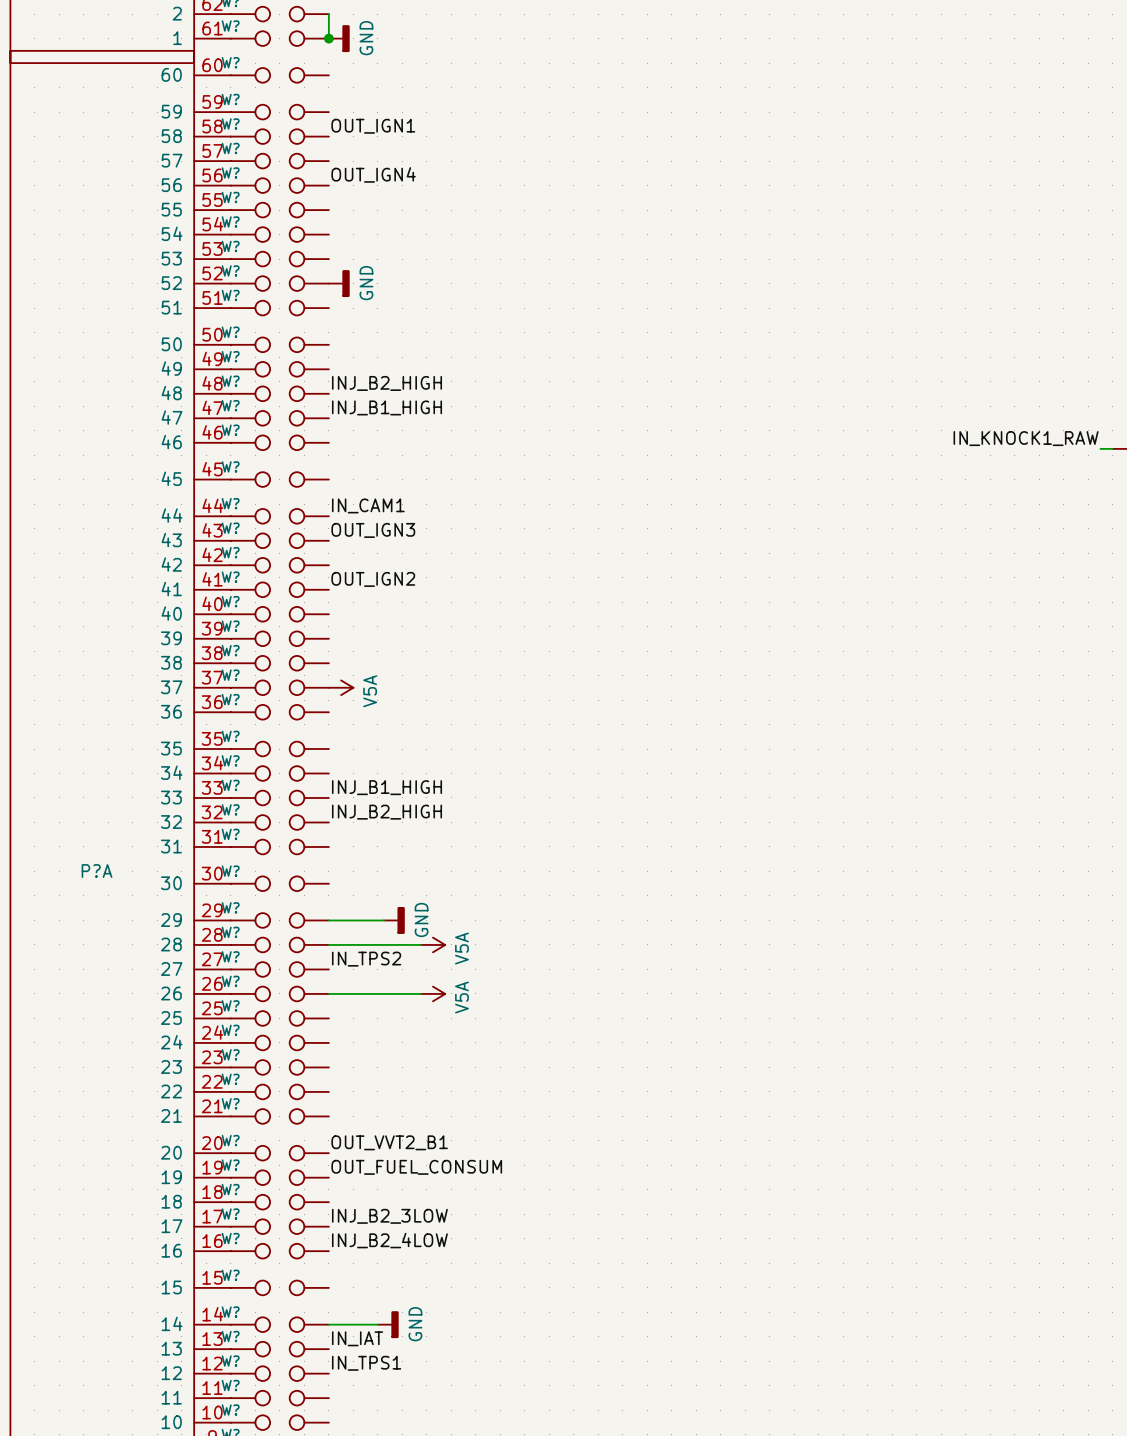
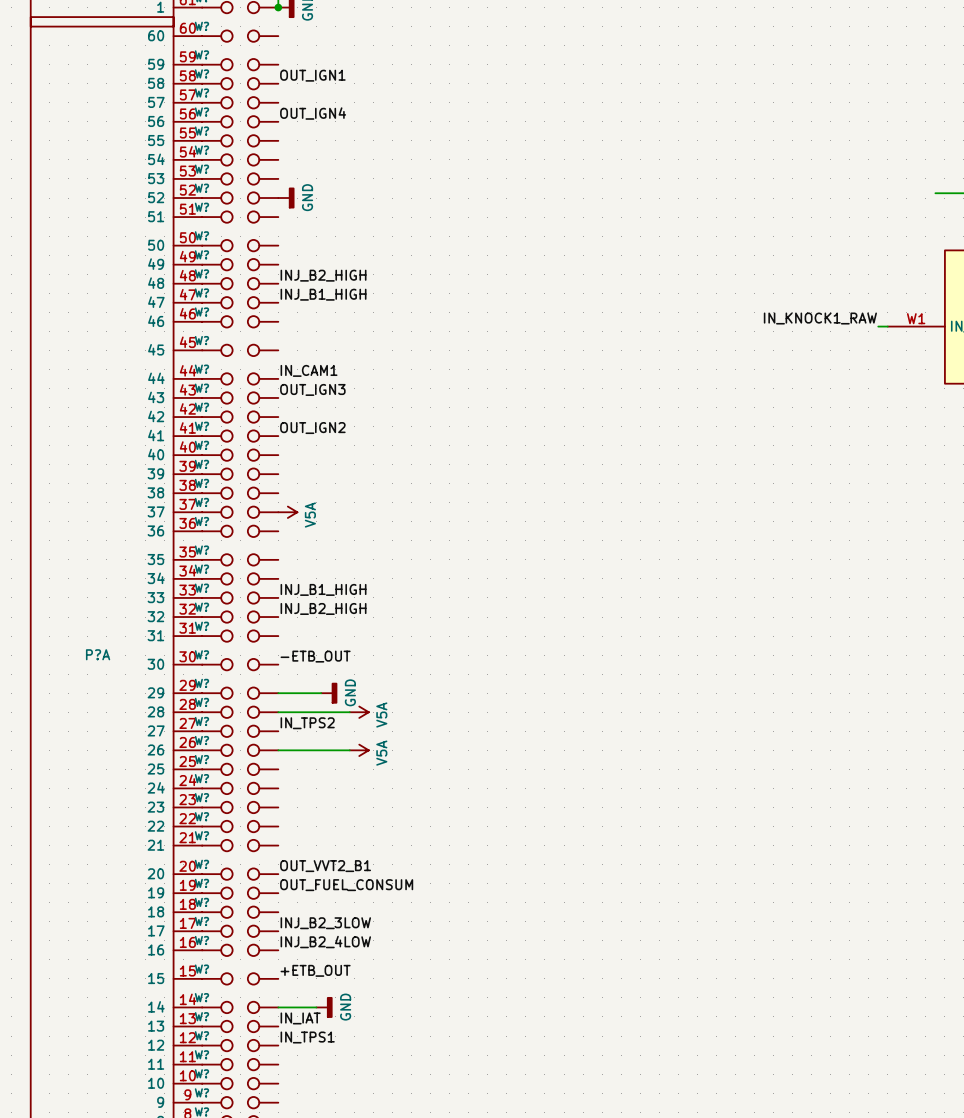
label: none -> -ETB_OUT (315, 656)
label: none -> +ETB_OUT (315, 970)

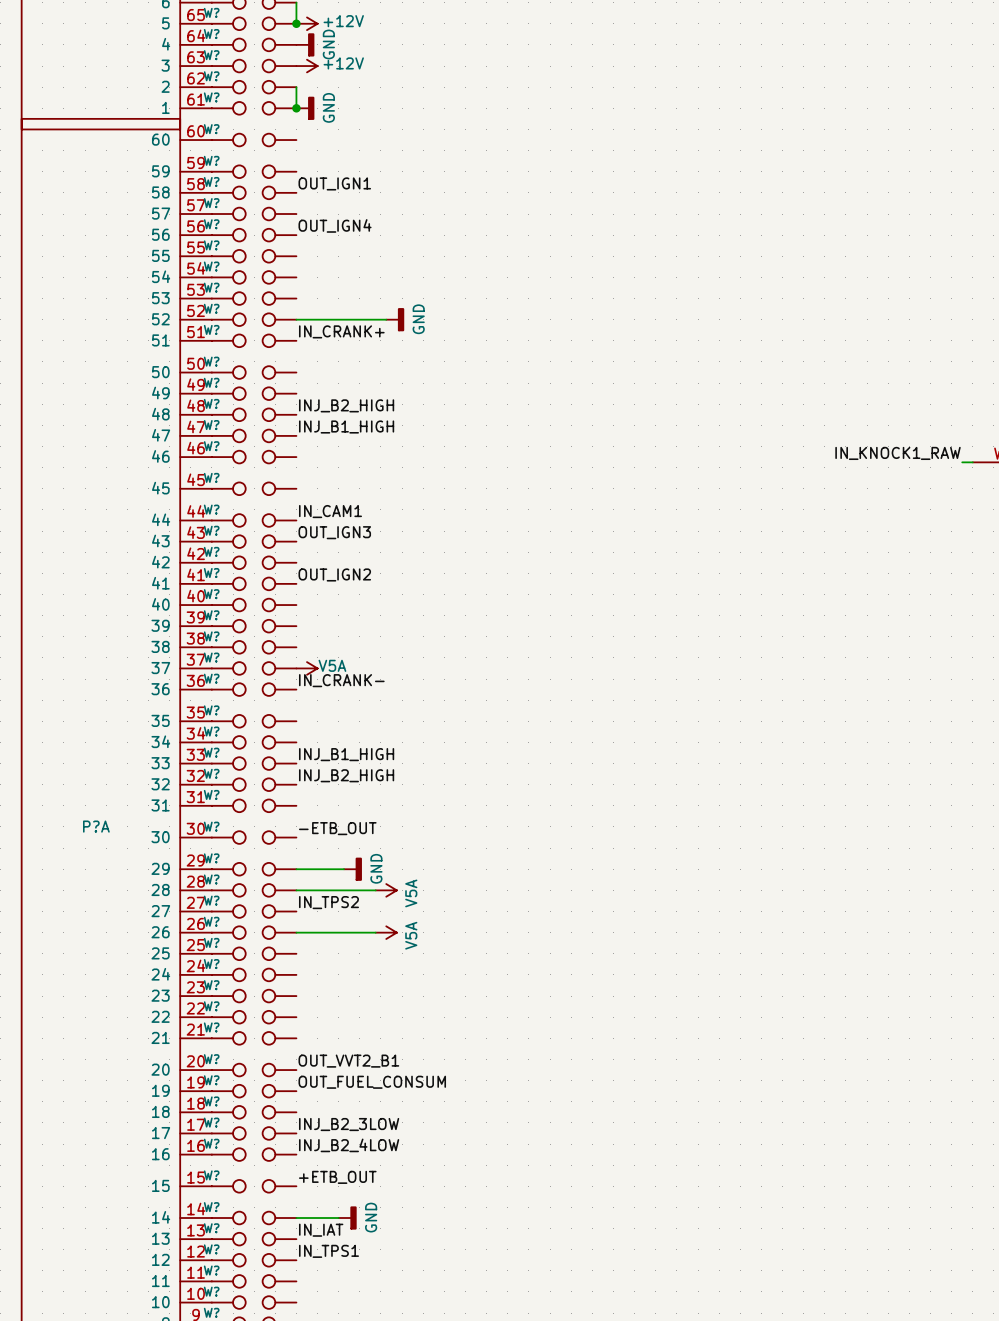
wire: none -> (296, 319) (386, 319)
power symbol position: GND (286, 198) -> GND (395, 319)
label: none -> IN_CRANK+ (341, 331)
power symbol text rotation: 0° (310, 515) -> 90° clockwise (332, 665)
label: none -> IN_CRANK- (341, 680)

